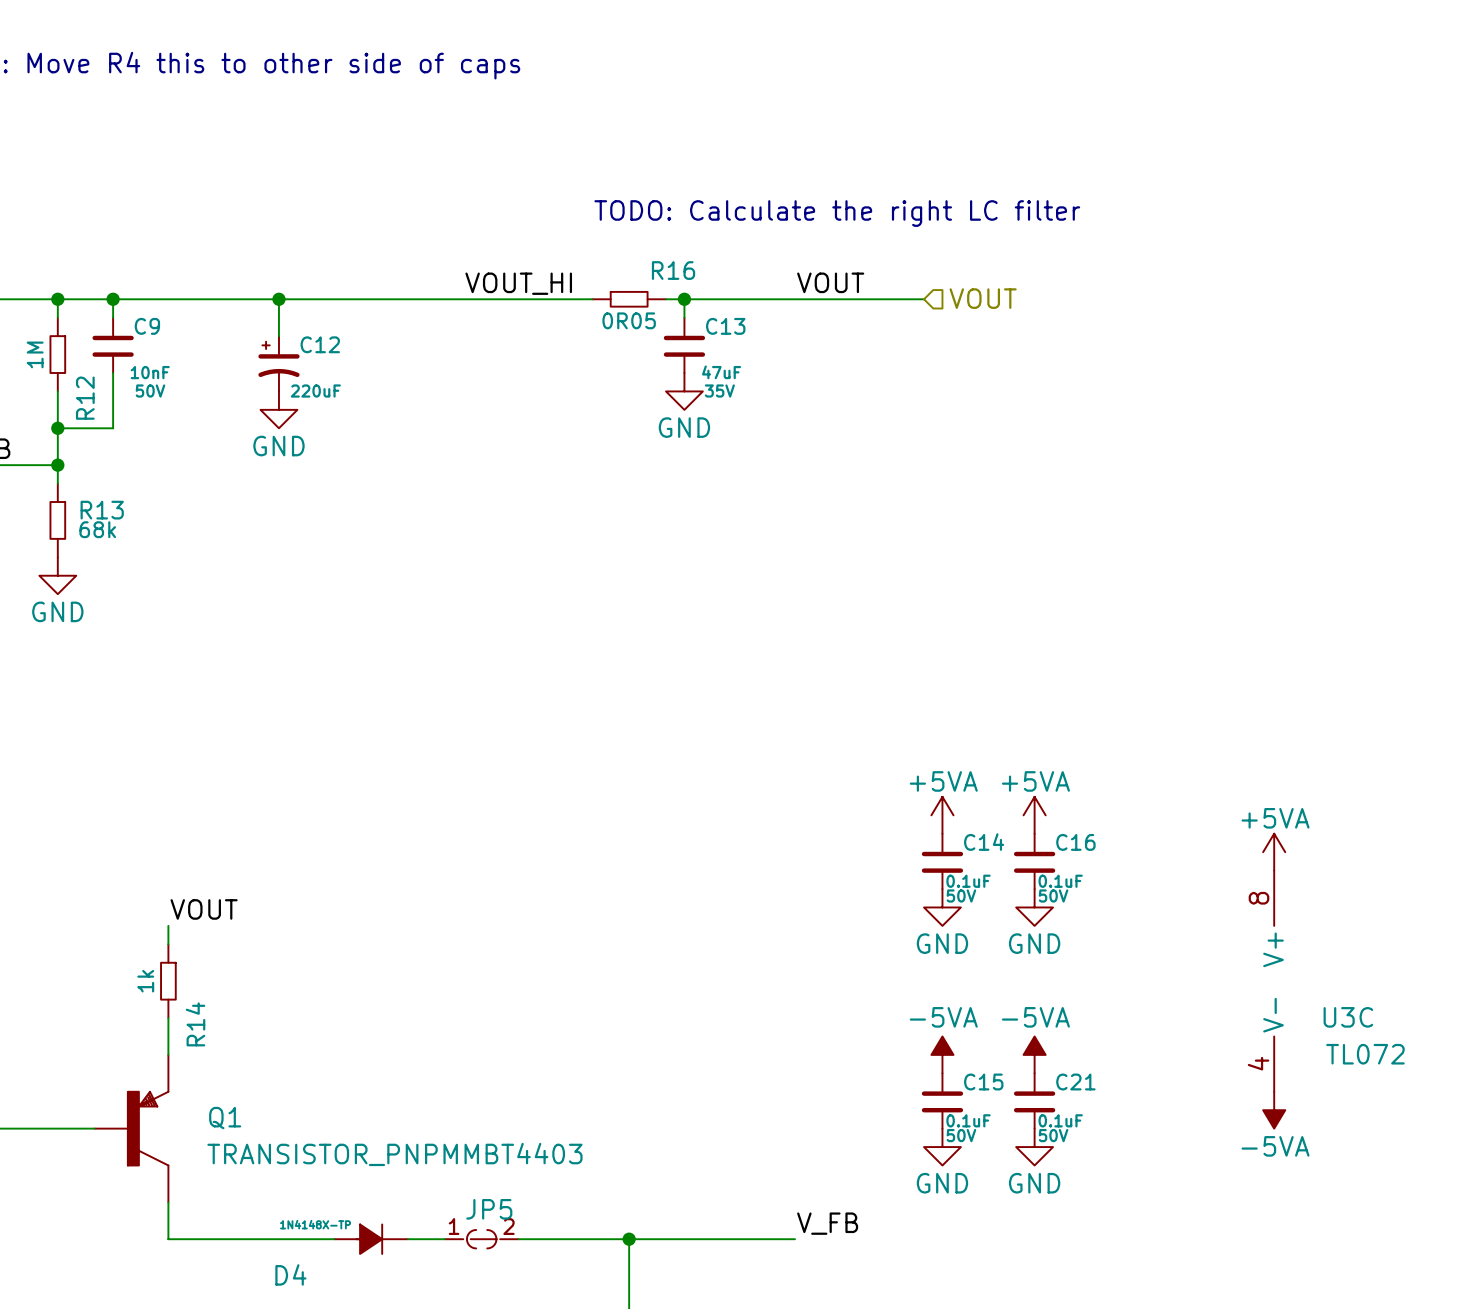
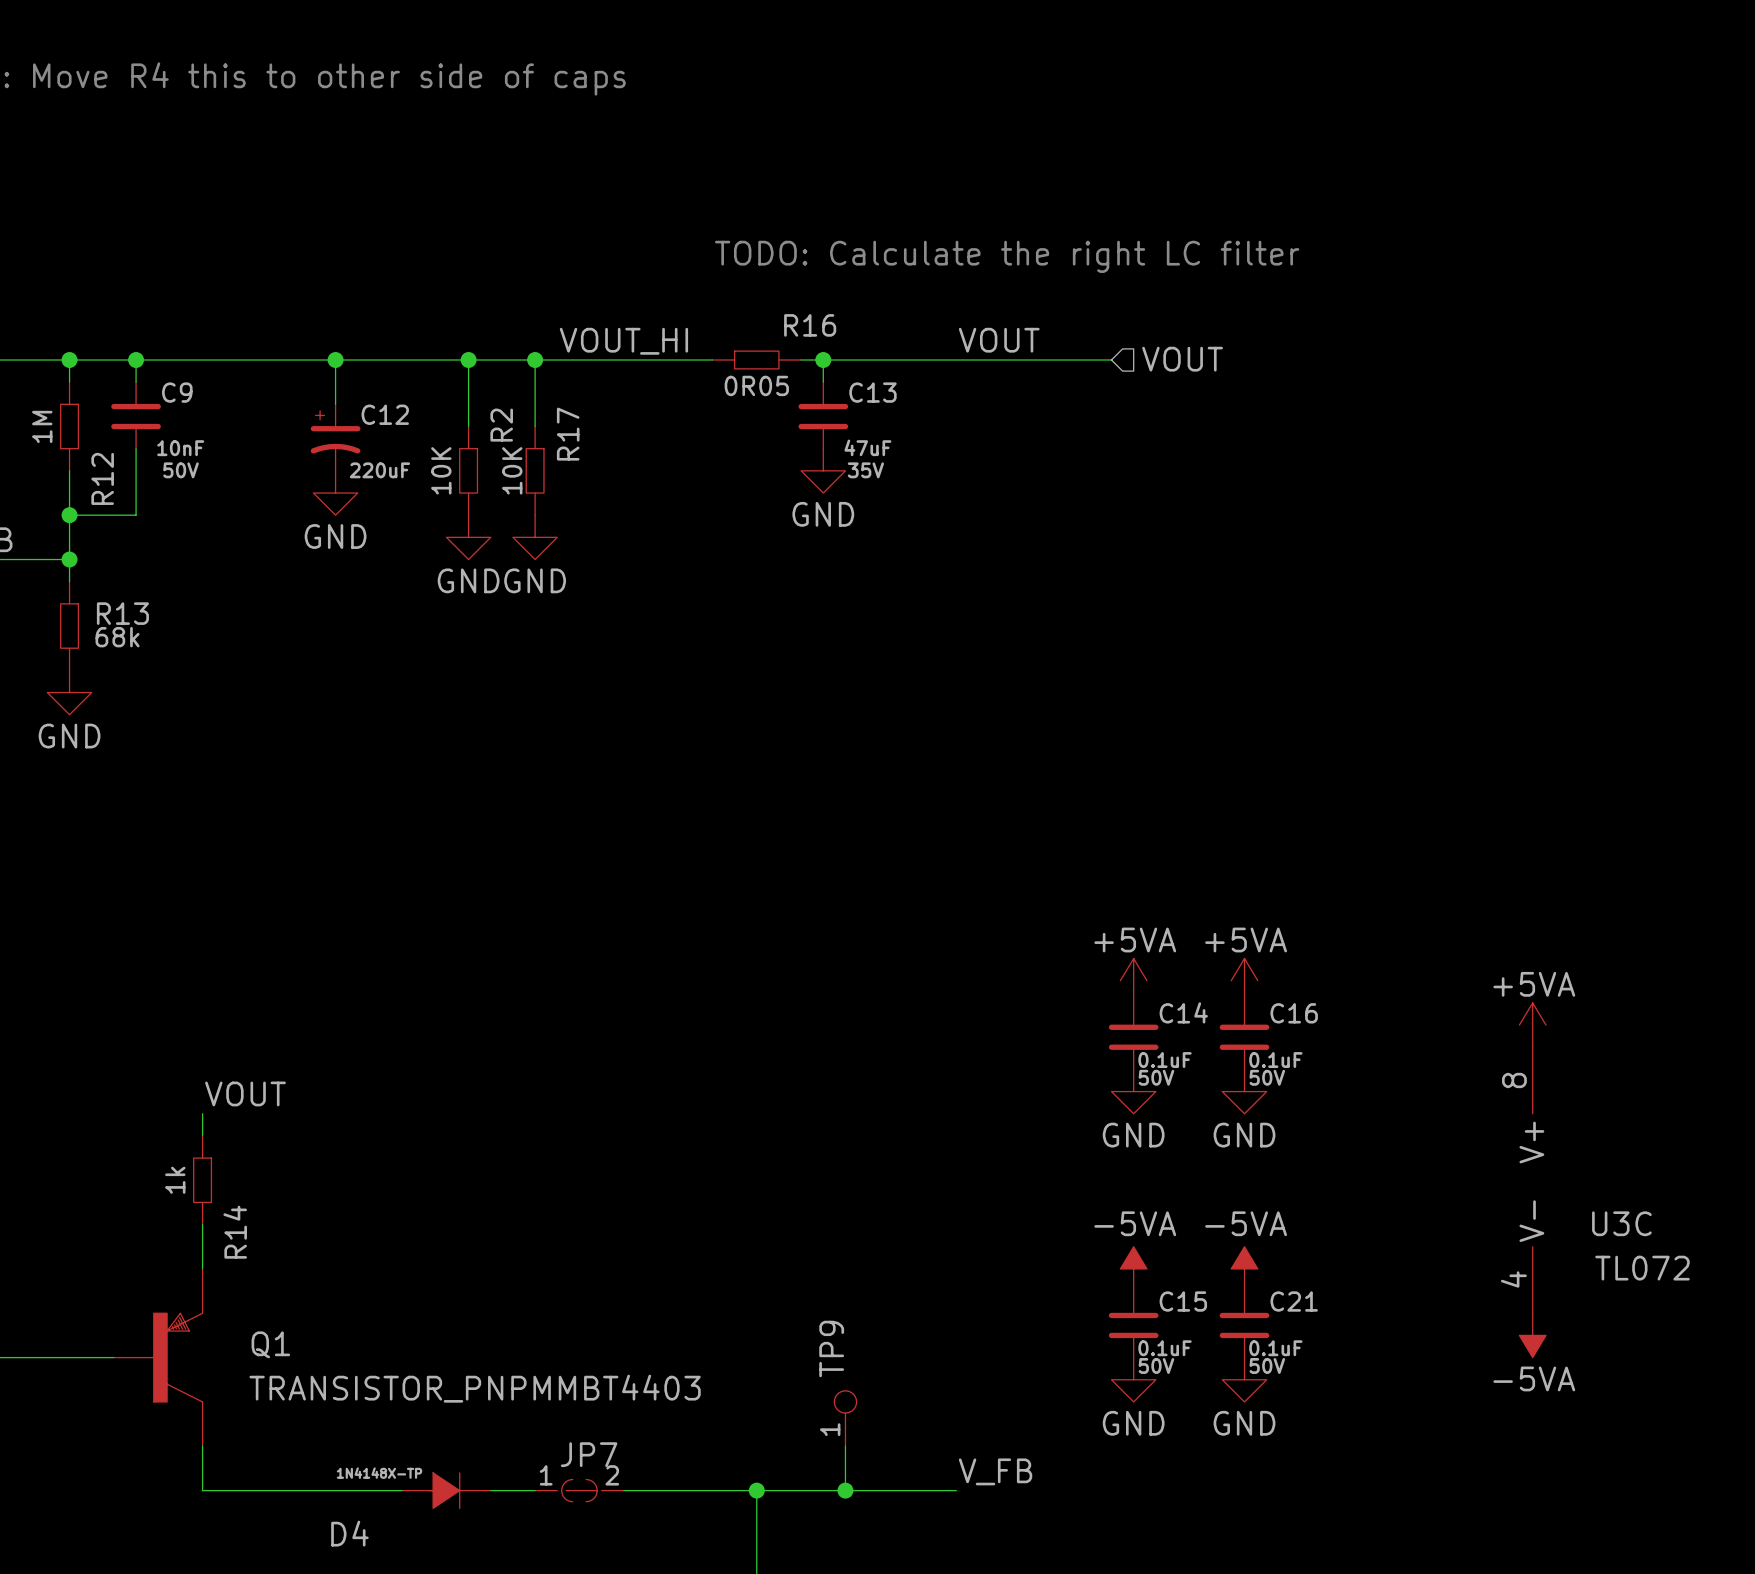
wire: none -> (468, 360) (468, 426)
junction: none -> (468, 360)
wire: none -> (535, 360) (535, 426)
junction: none -> (535, 360)
R2: none -> (468, 470)
R17: none -> (535, 470)
power symbol: none -> GND (468, 537)
power symbol: none -> GND (535, 537)
TP9: none -> (845, 1418)
wire: none -> (845, 1446) (845, 1490)
JP5 name: JP5 (489, 1209) -> JP7 (589, 1454)
junction: none -> (845, 1490)

